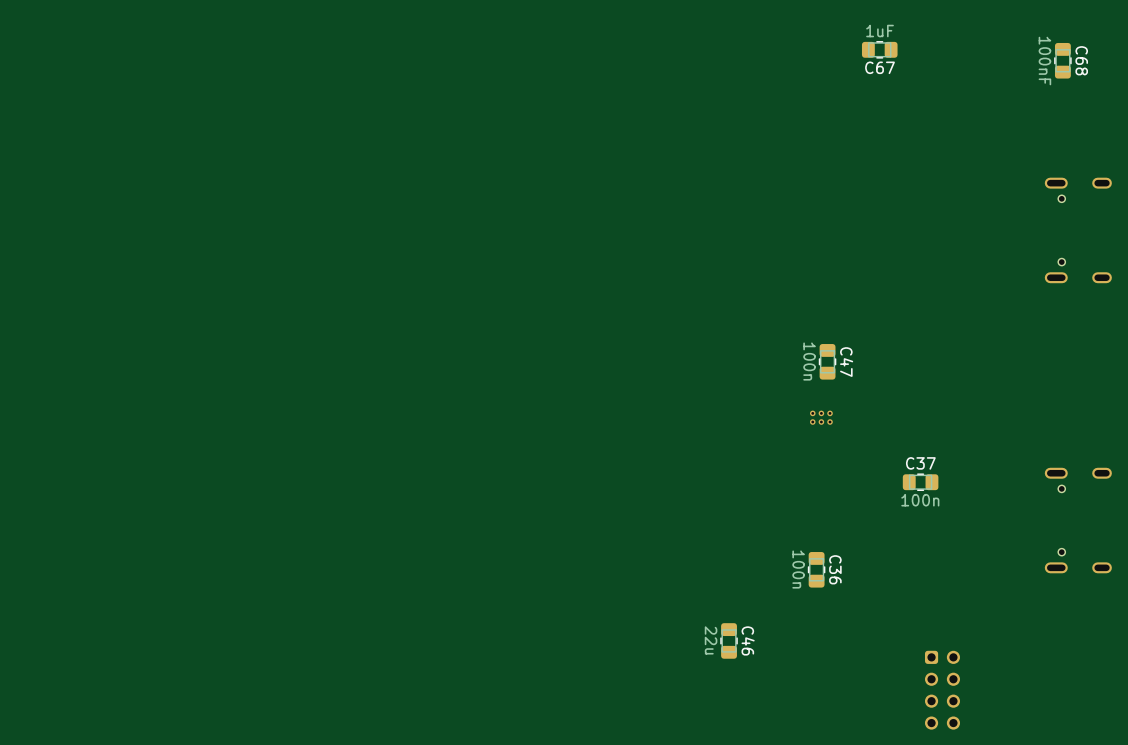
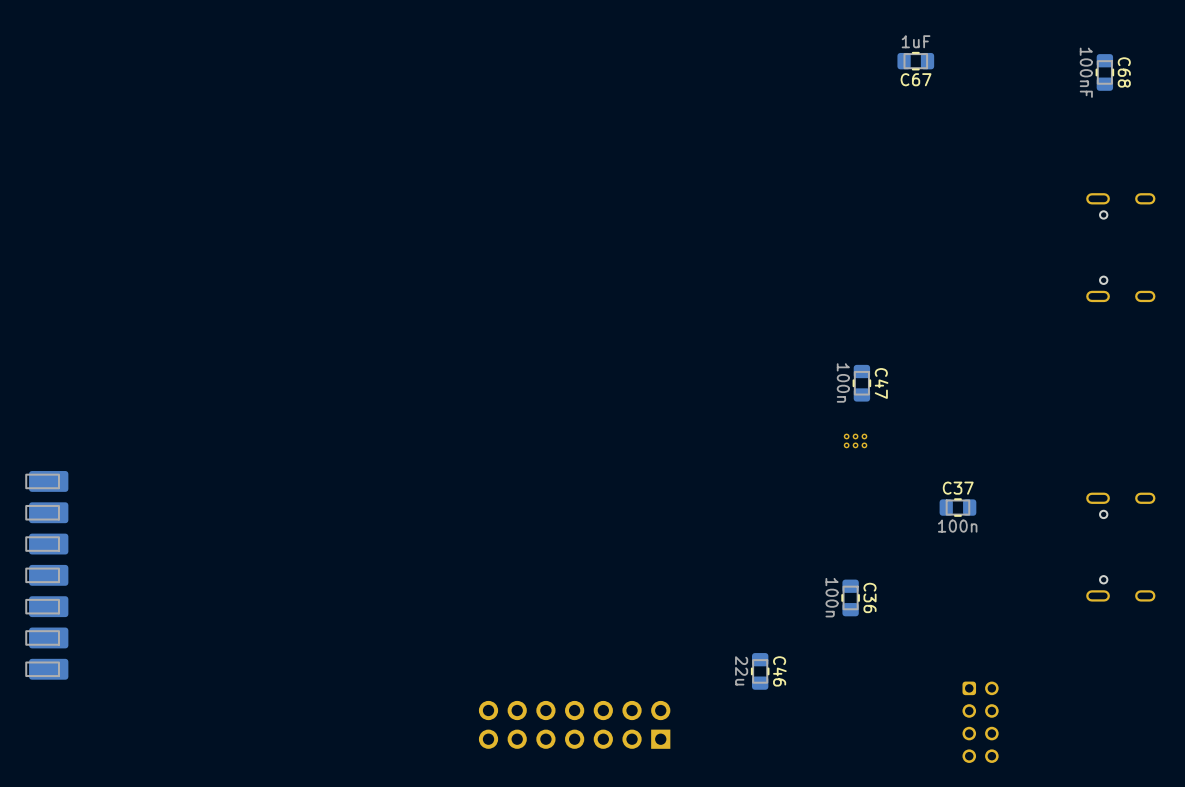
part: none -> (47, 575)
part: none -> (574, 724)

